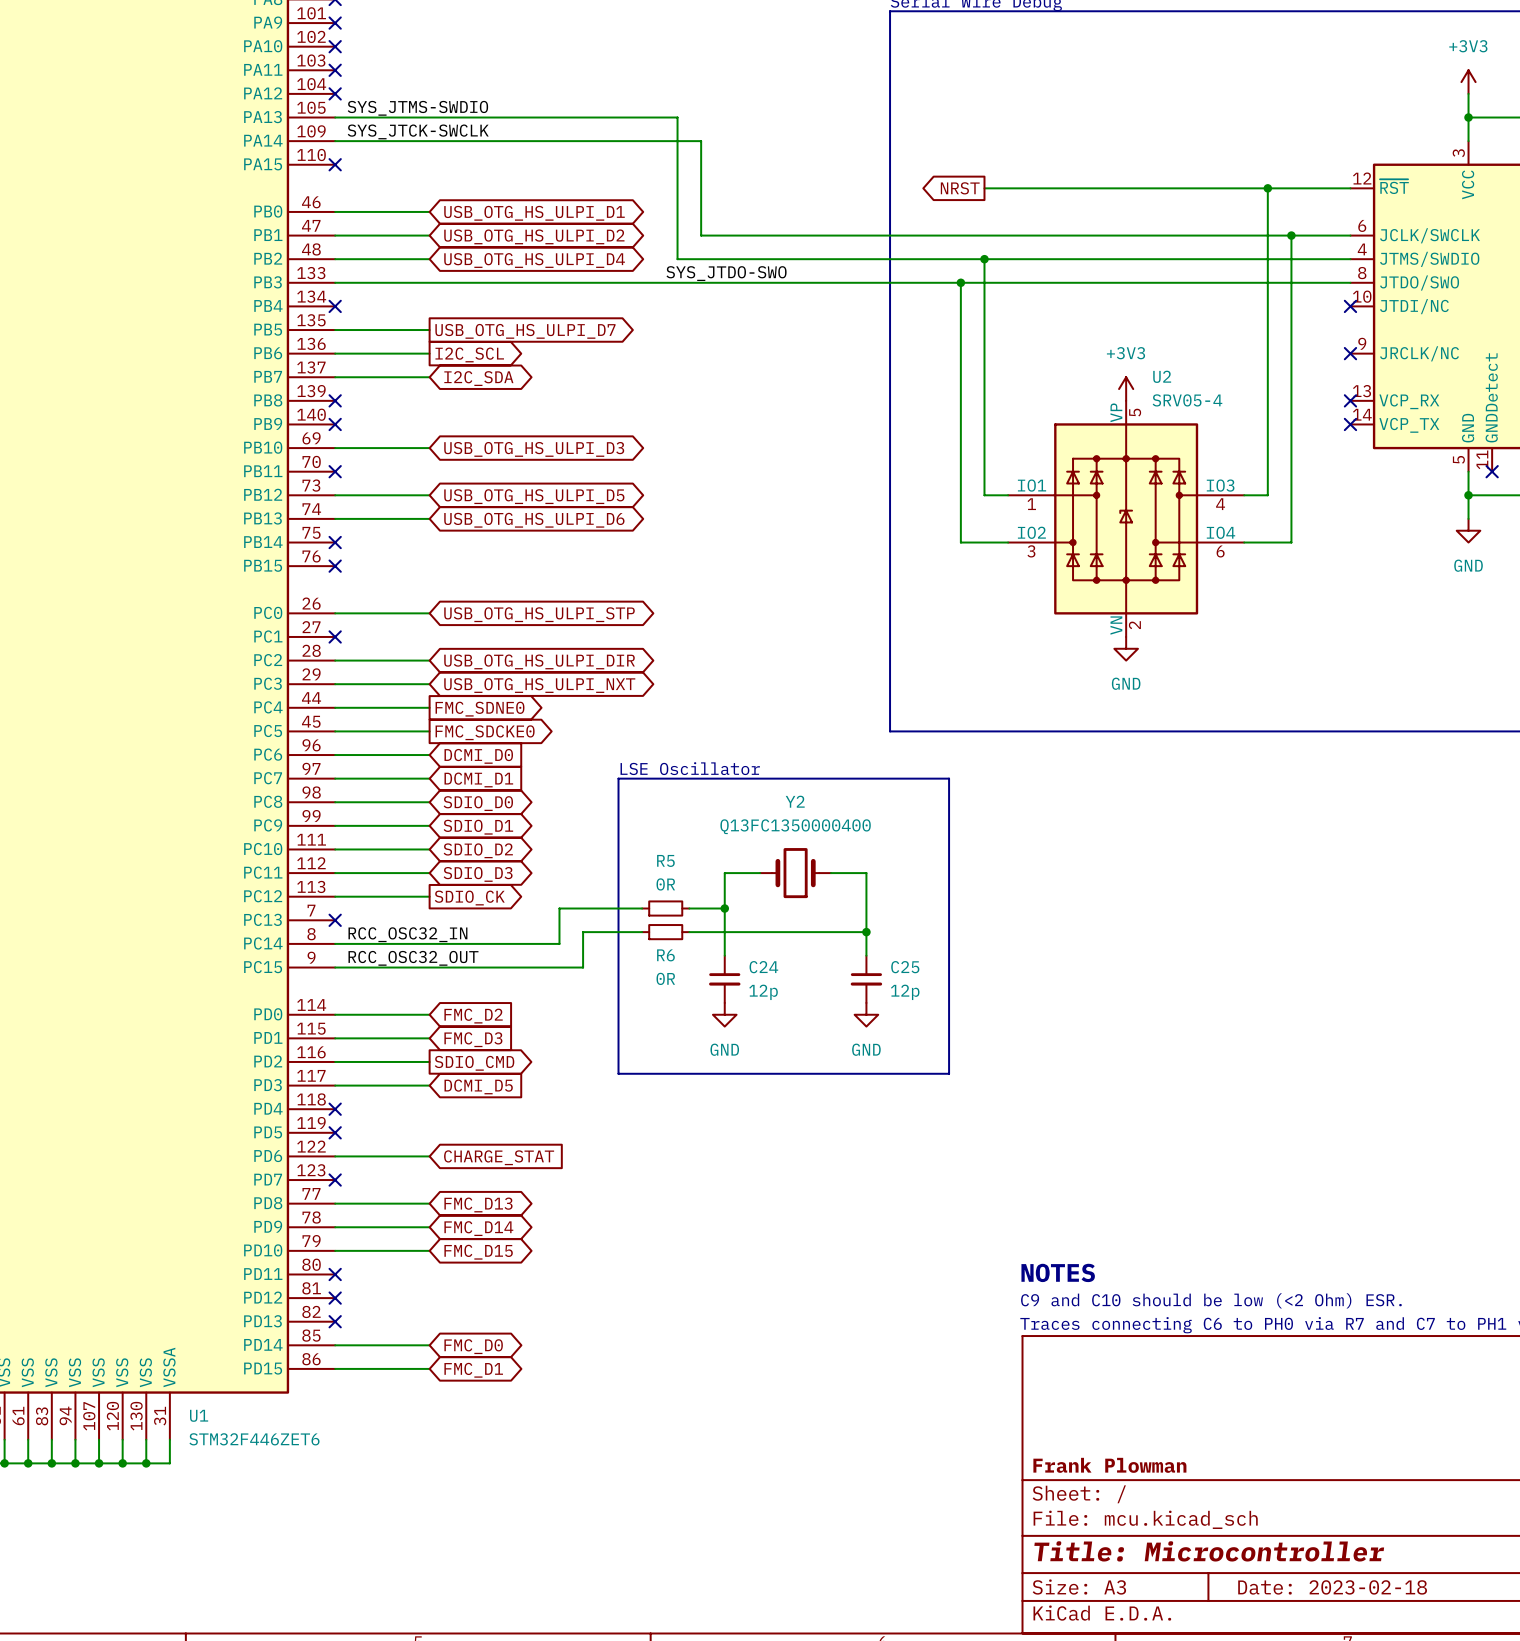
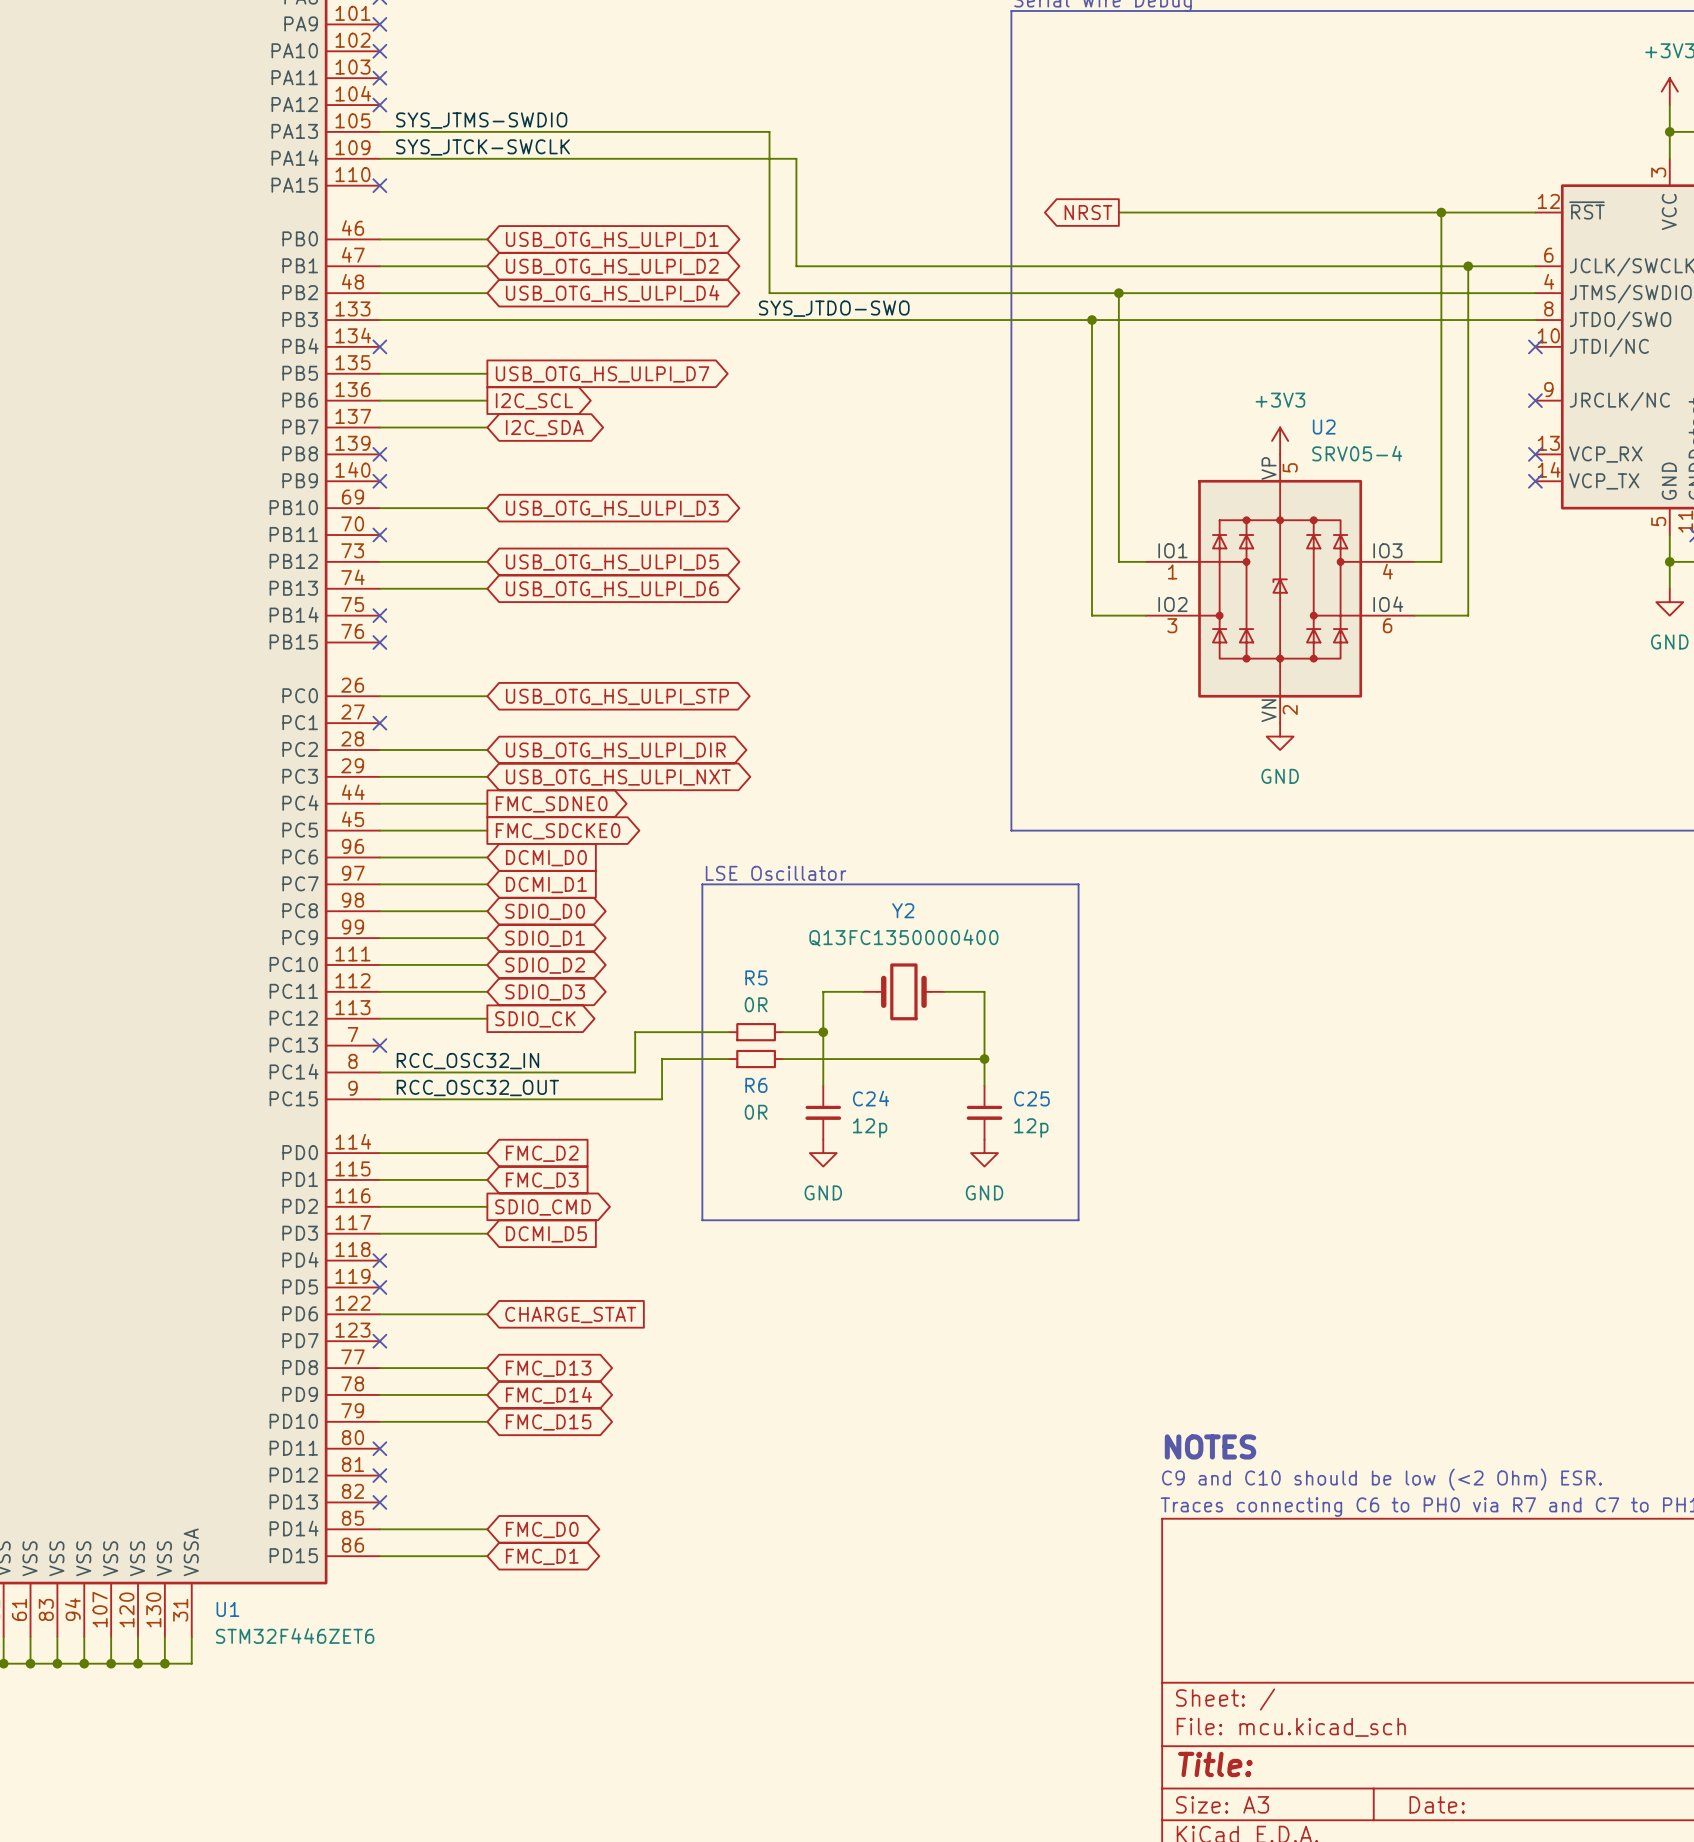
title block: Frank Plowman (1109, 1465) -> none
title block: Title: Microcontroller (1209, 1551) -> Title: (1215, 1764)
title block: Date: 2023-02-18 (1332, 1587) -> Date: (1437, 1804)

